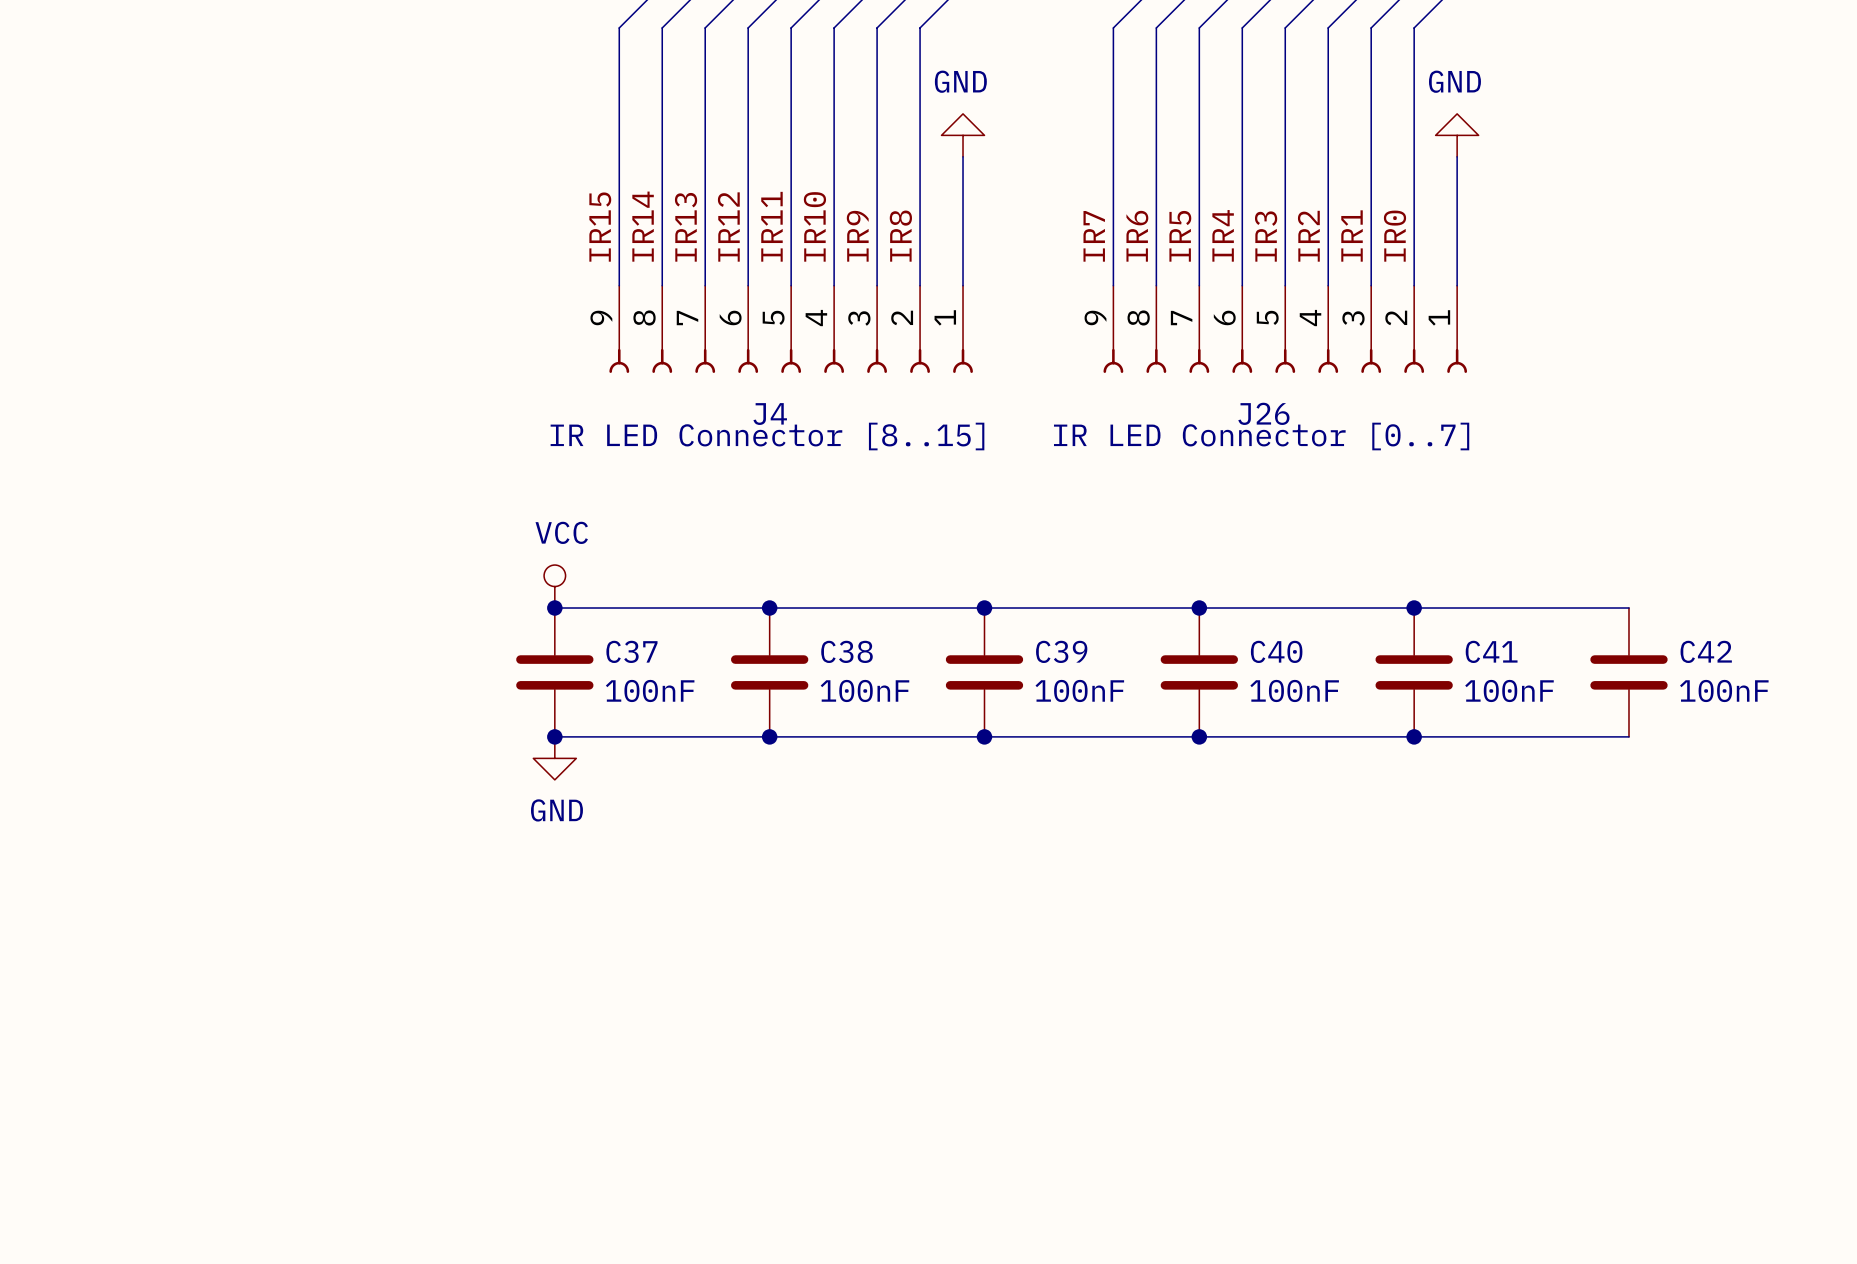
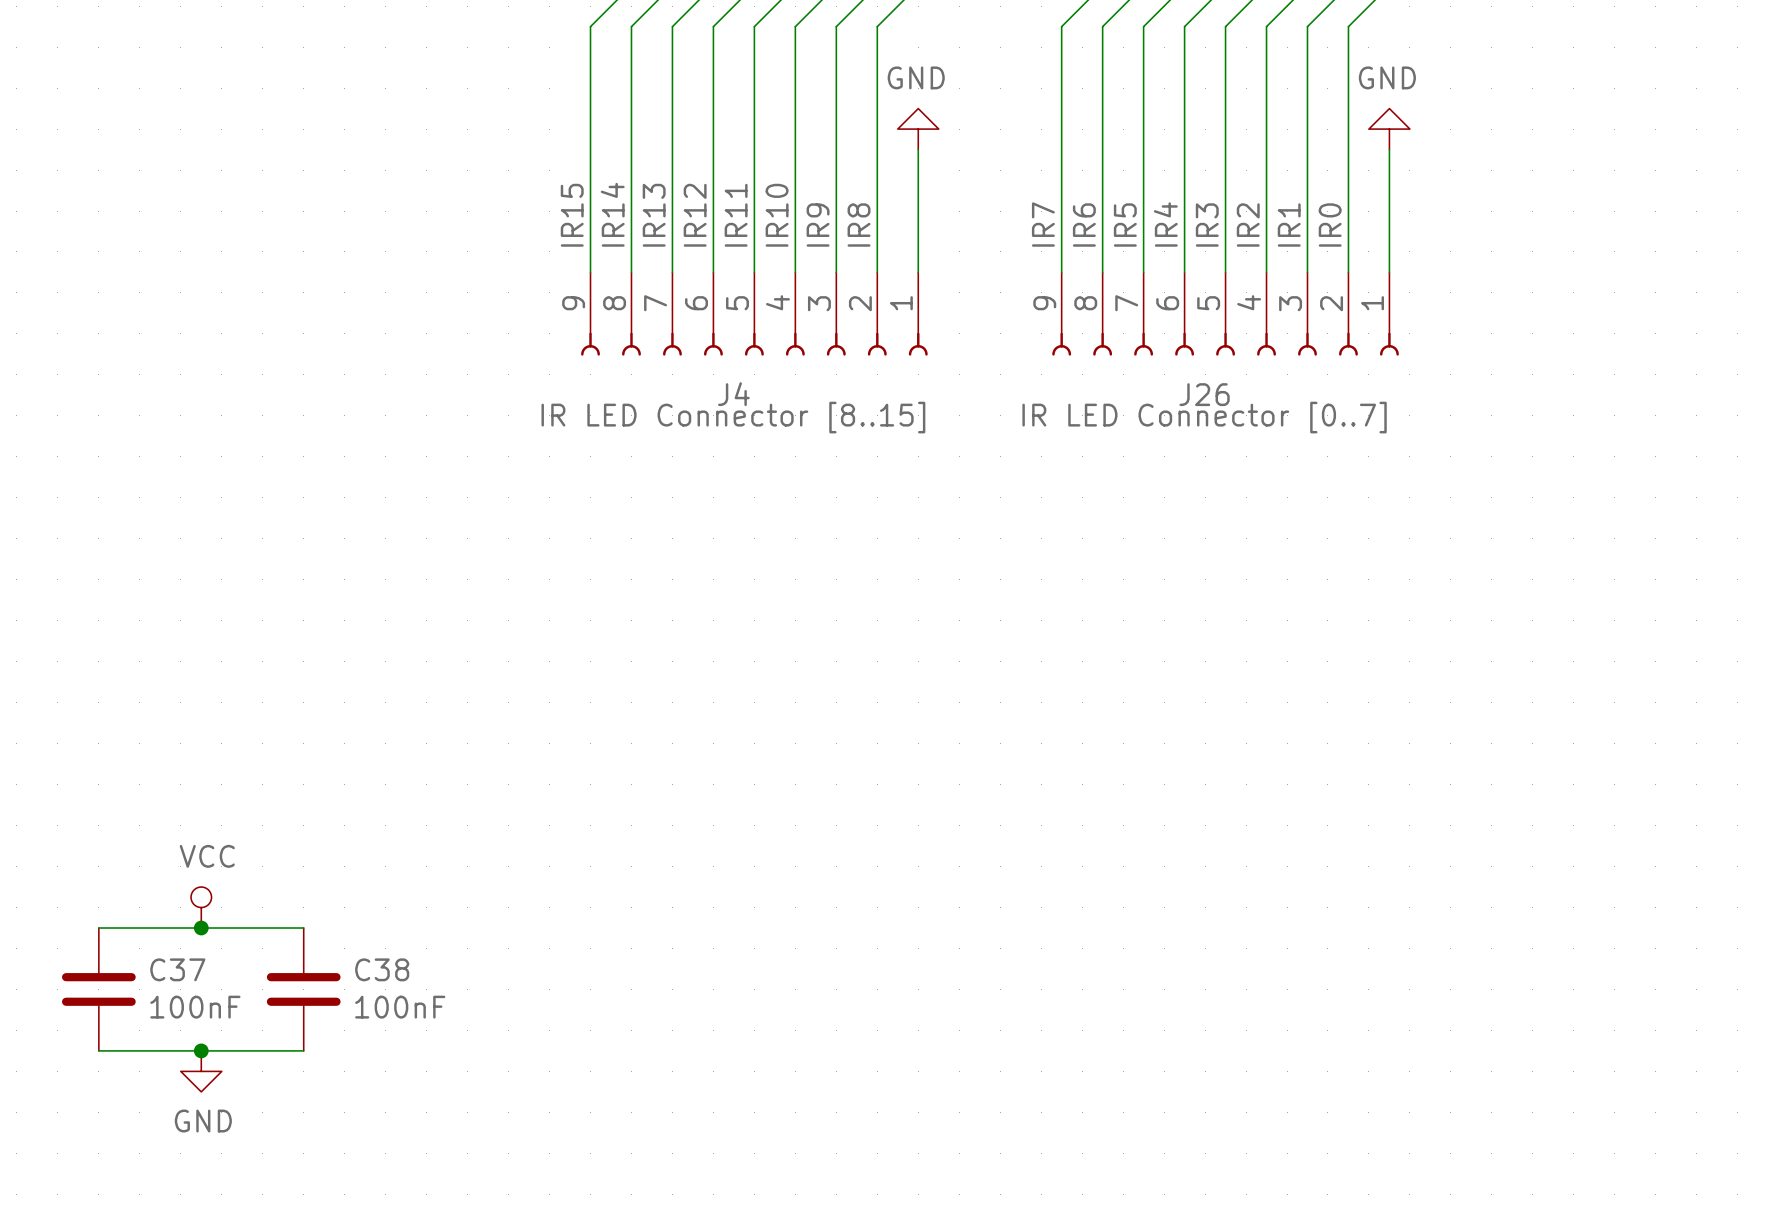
power symbol: VCC (554, 586) -> none
wire: (554, 608) (1628, 608) -> none
junction: (554, 608) -> none
junction: (769, 608) -> none
junction: (984, 608) -> none
junction: (1199, 608) -> none
junction: (1414, 608) -> none
C37 position: (554, 672) -> (98, 989)
C38 position: (769, 672) -> (303, 989)
C39: 100nF (984, 672) -> none
C40: 100nF (1199, 672) -> none
C41: 100nF (1414, 672) -> none
C42: 100nF (1628, 672) -> none
wire: (554, 736) (1628, 736) -> none
junction: (554, 736) -> none
junction: (769, 736) -> none
junction: (984, 736) -> none
junction: (1199, 736) -> none
junction: (1414, 736) -> none
power symbol: GND (554, 758) -> none
power symbol: none -> VCC (201, 907)
wire: none -> (98, 928) (303, 928)
junction: none -> (201, 928)
wire: none -> (98, 1050) (303, 1050)
junction: none -> (201, 1050)
power symbol: none -> GND (201, 1071)

